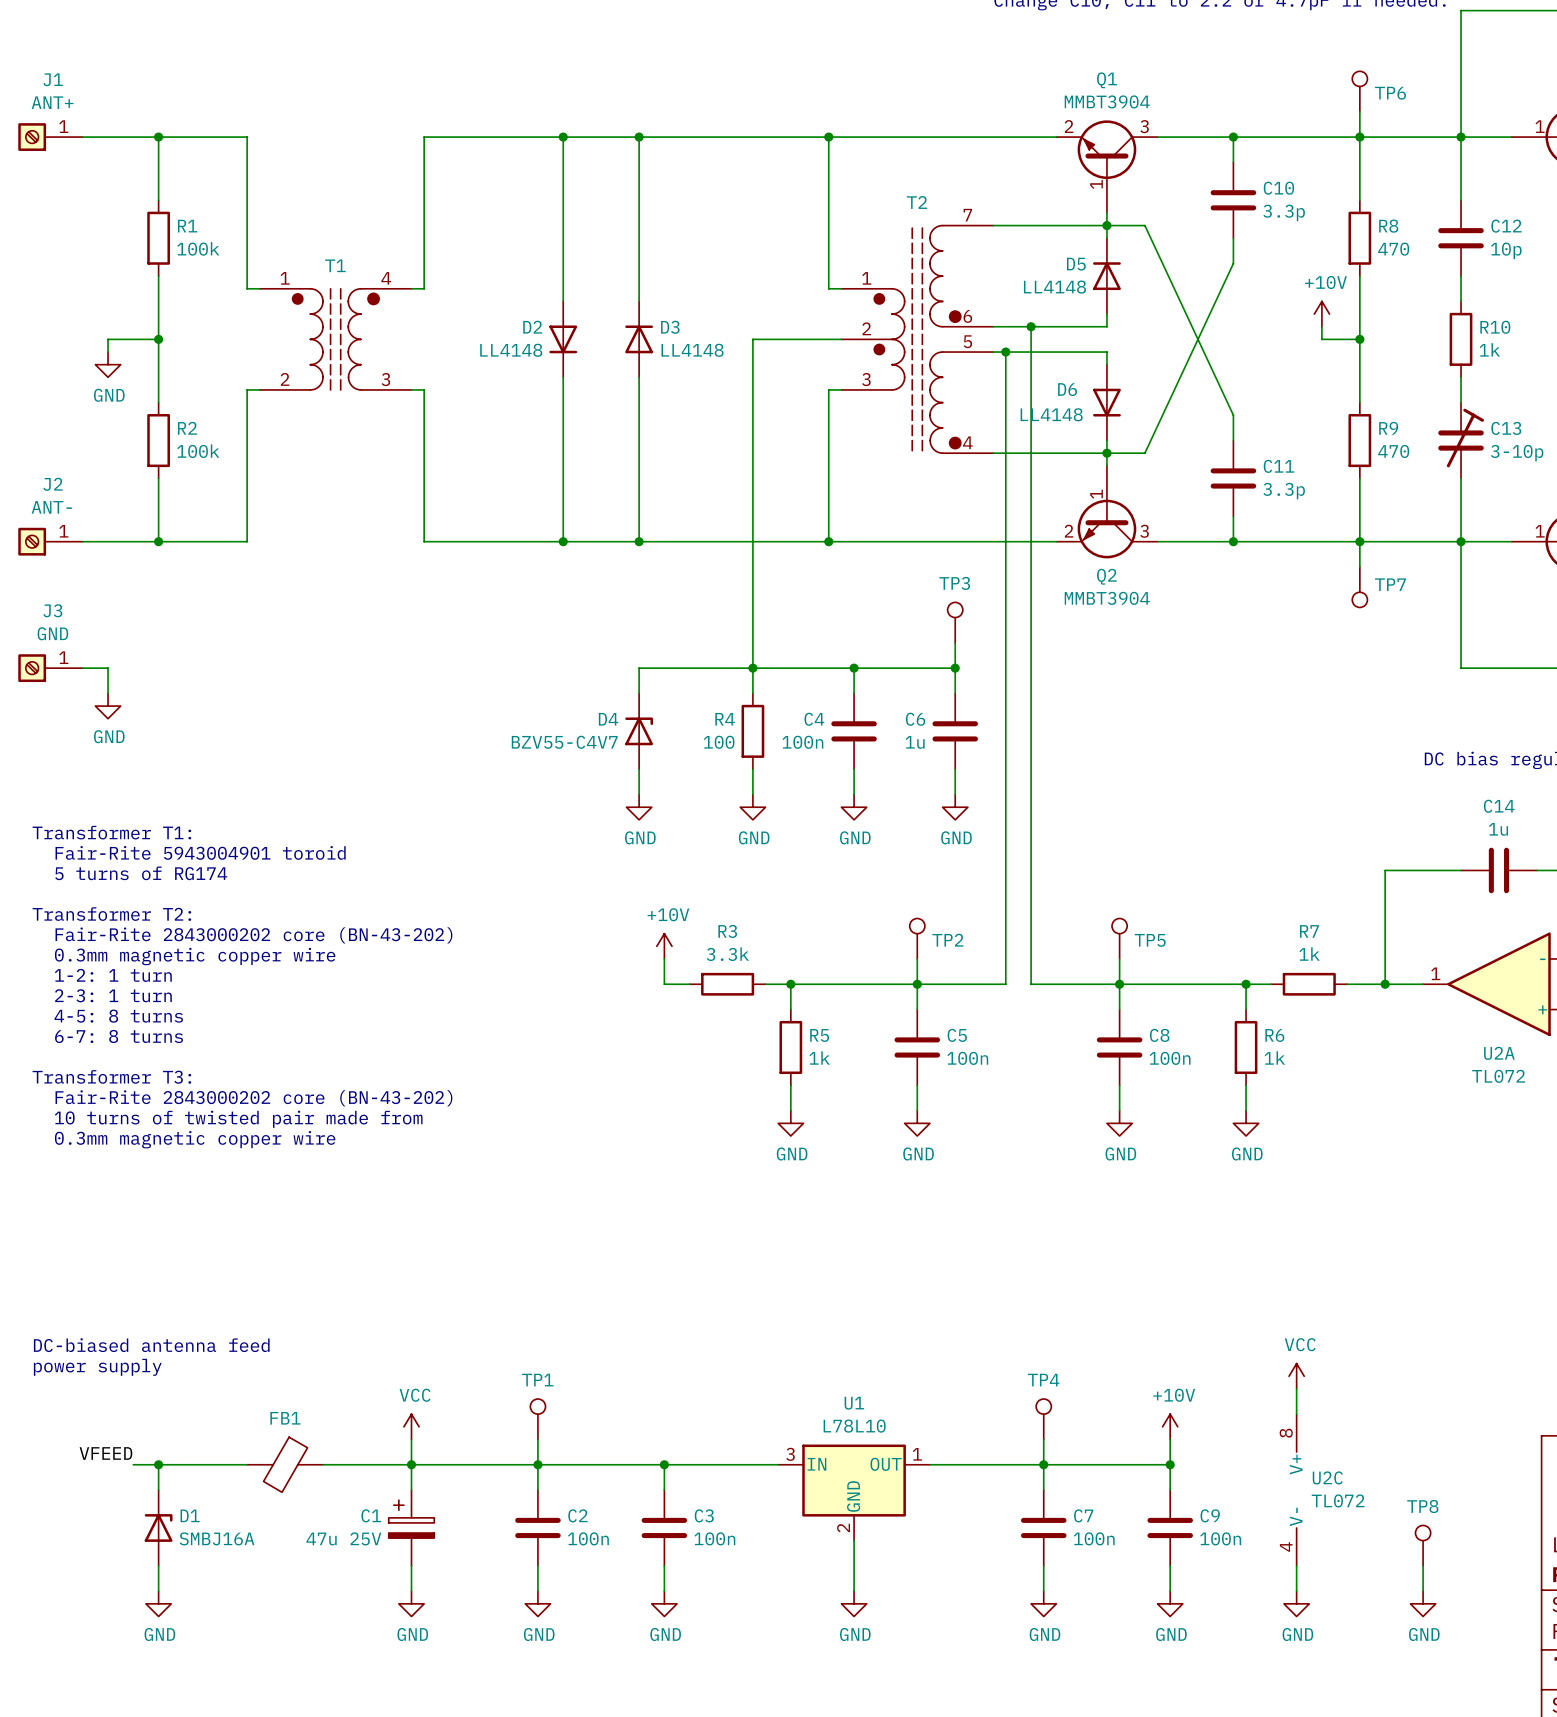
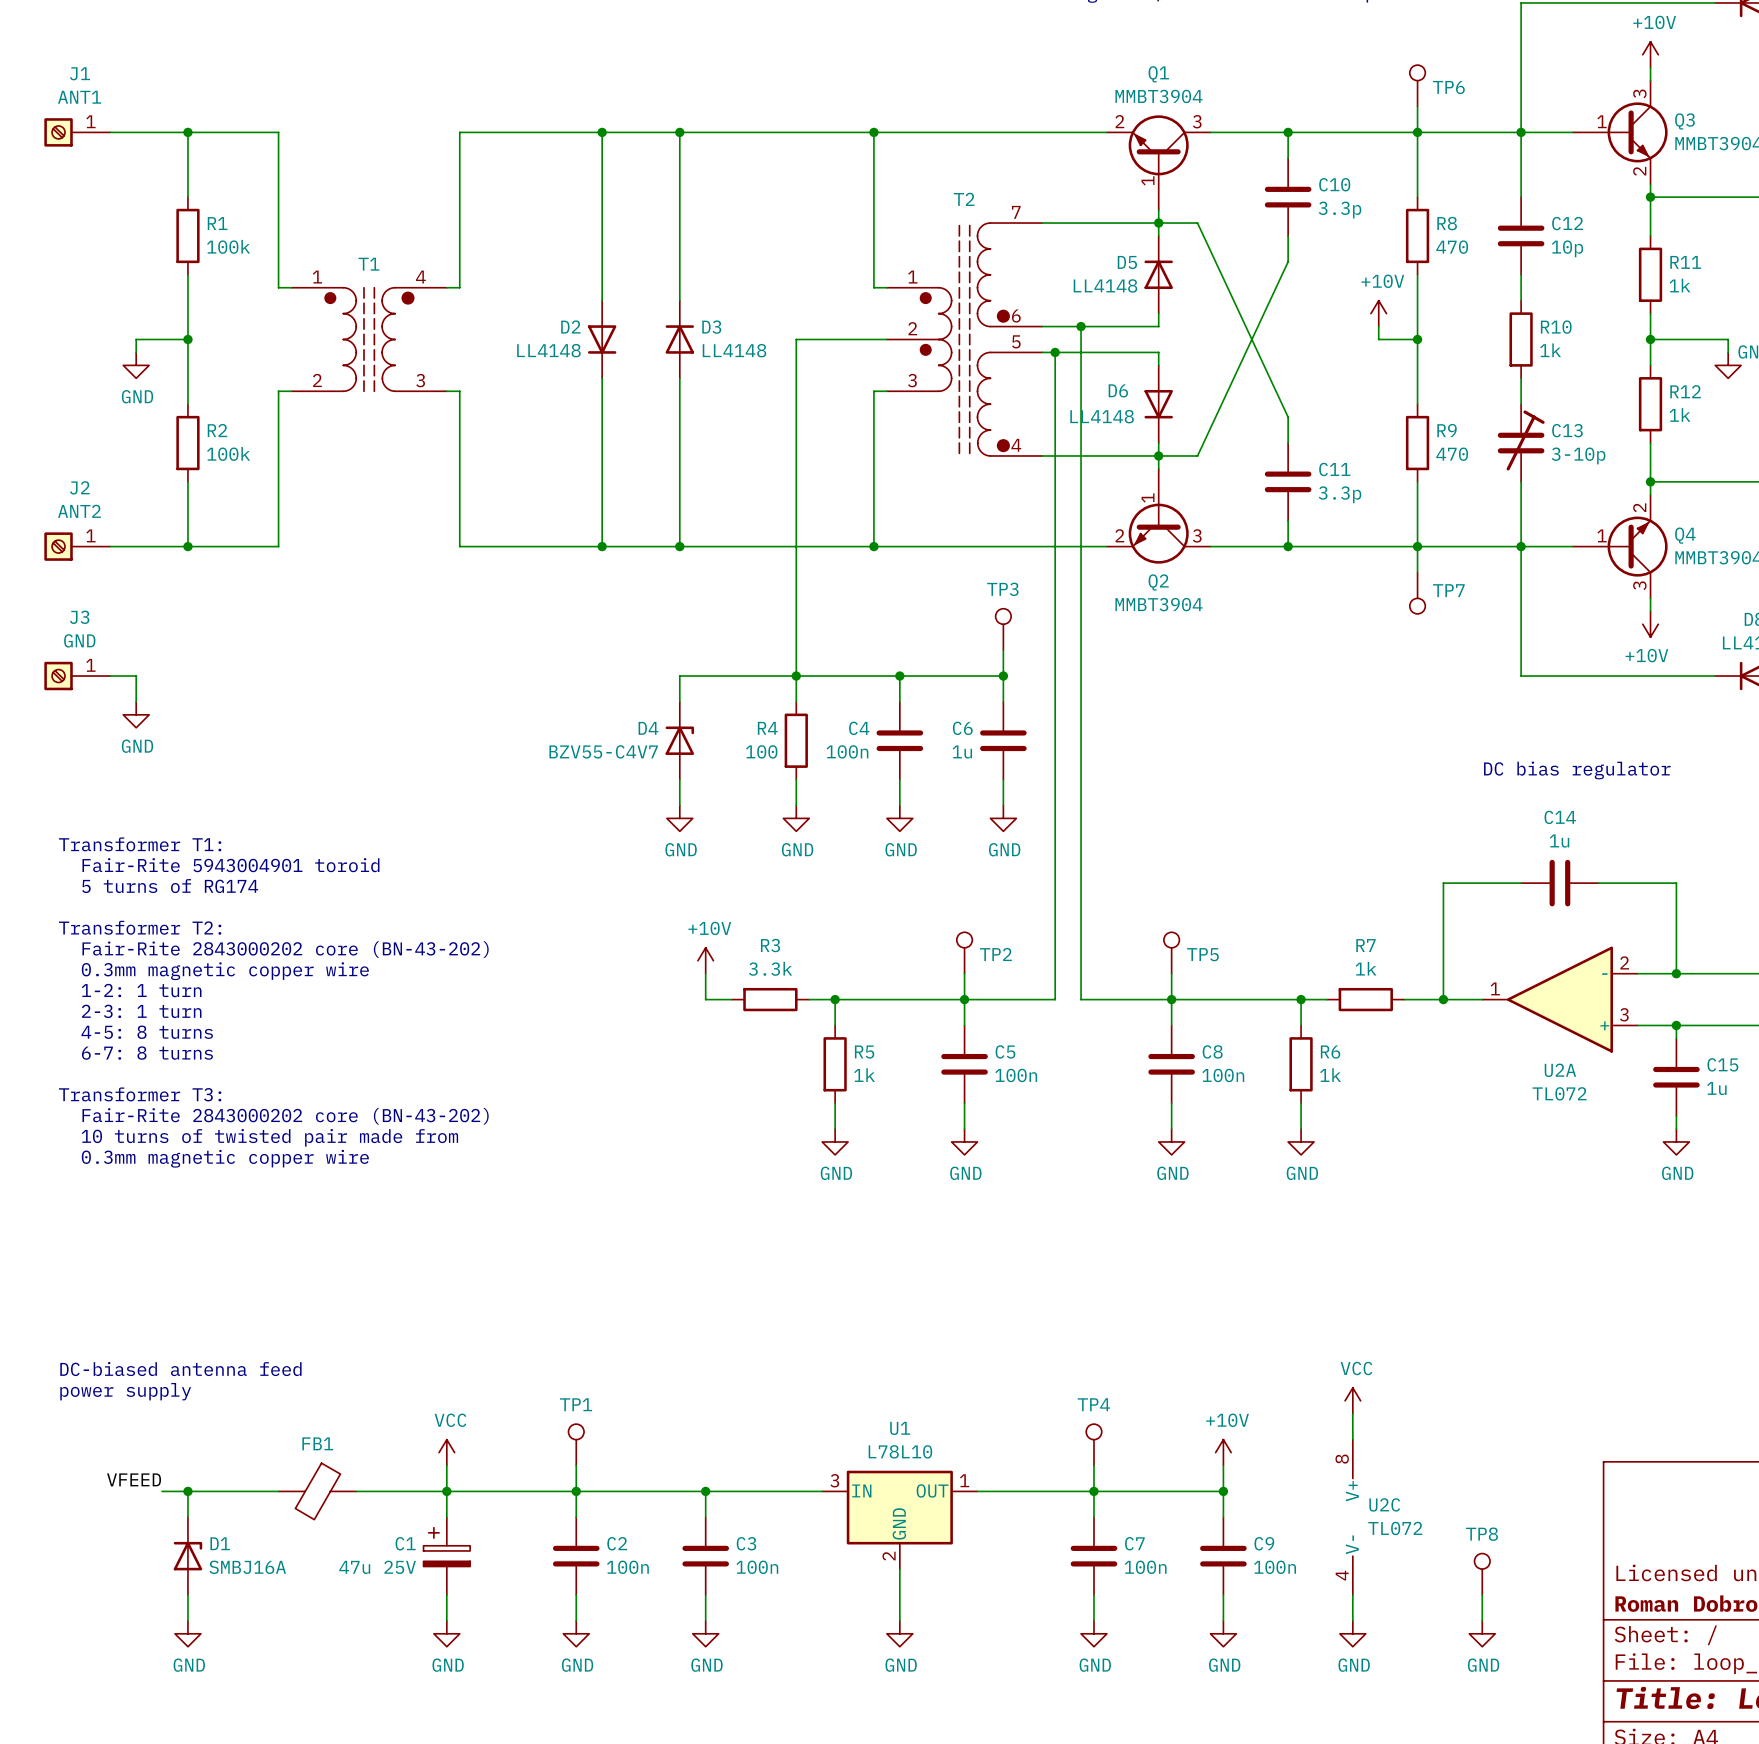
J1 value: ANT+ (52, 102) -> ANT1 (79, 97)
J2 value: ANT- (51, 507) -> ANT2 (79, 511)

